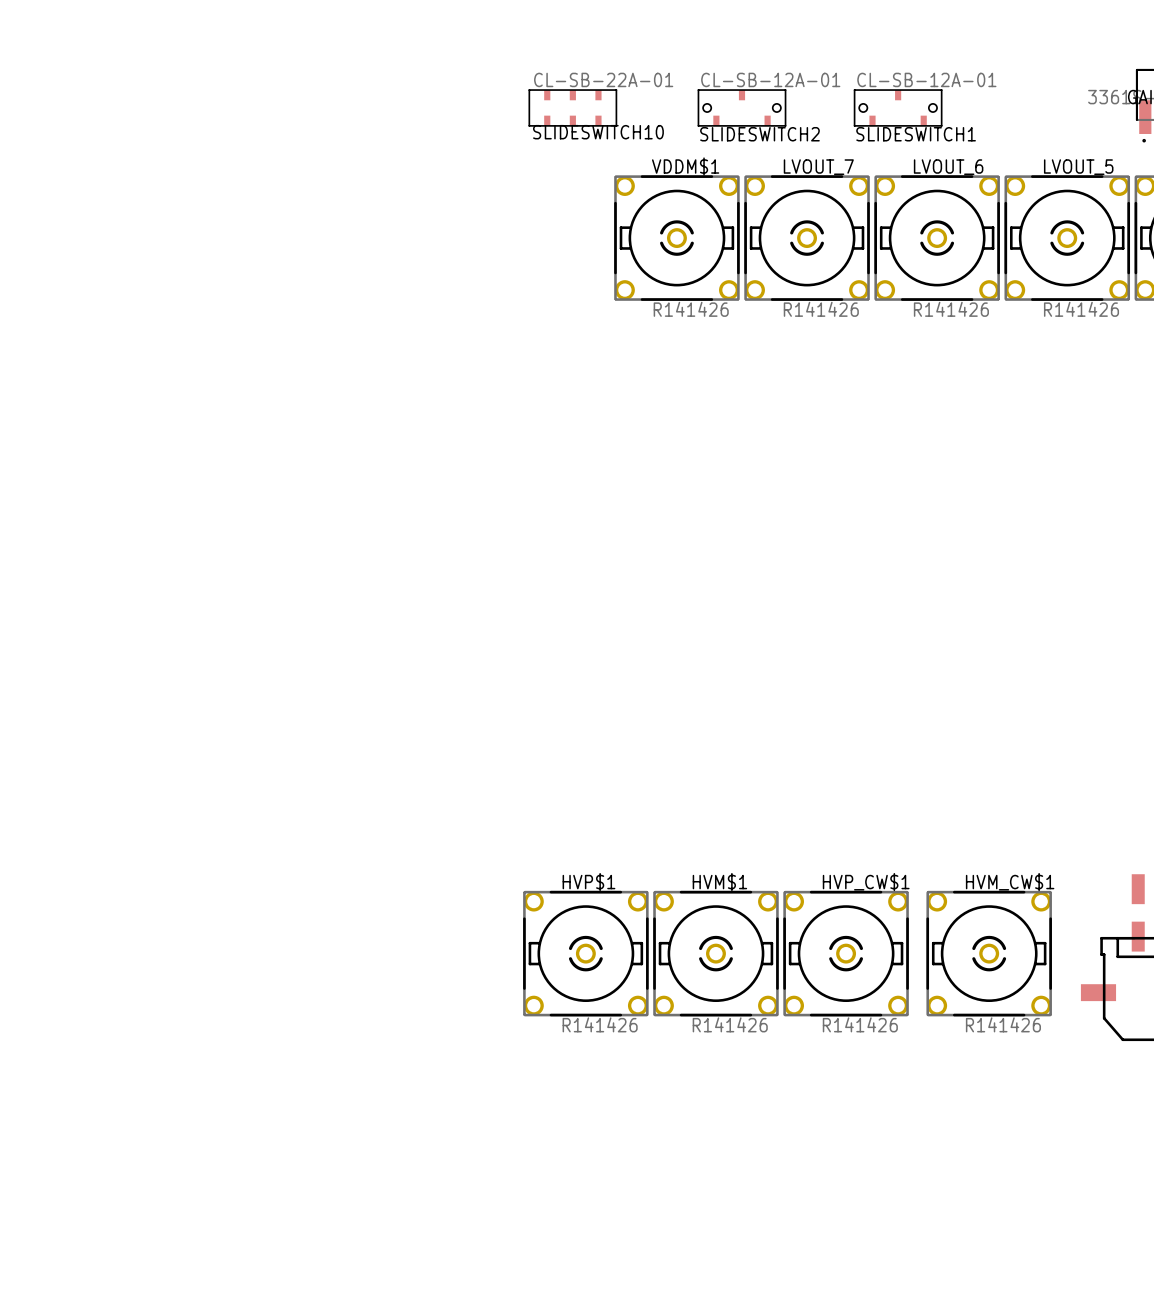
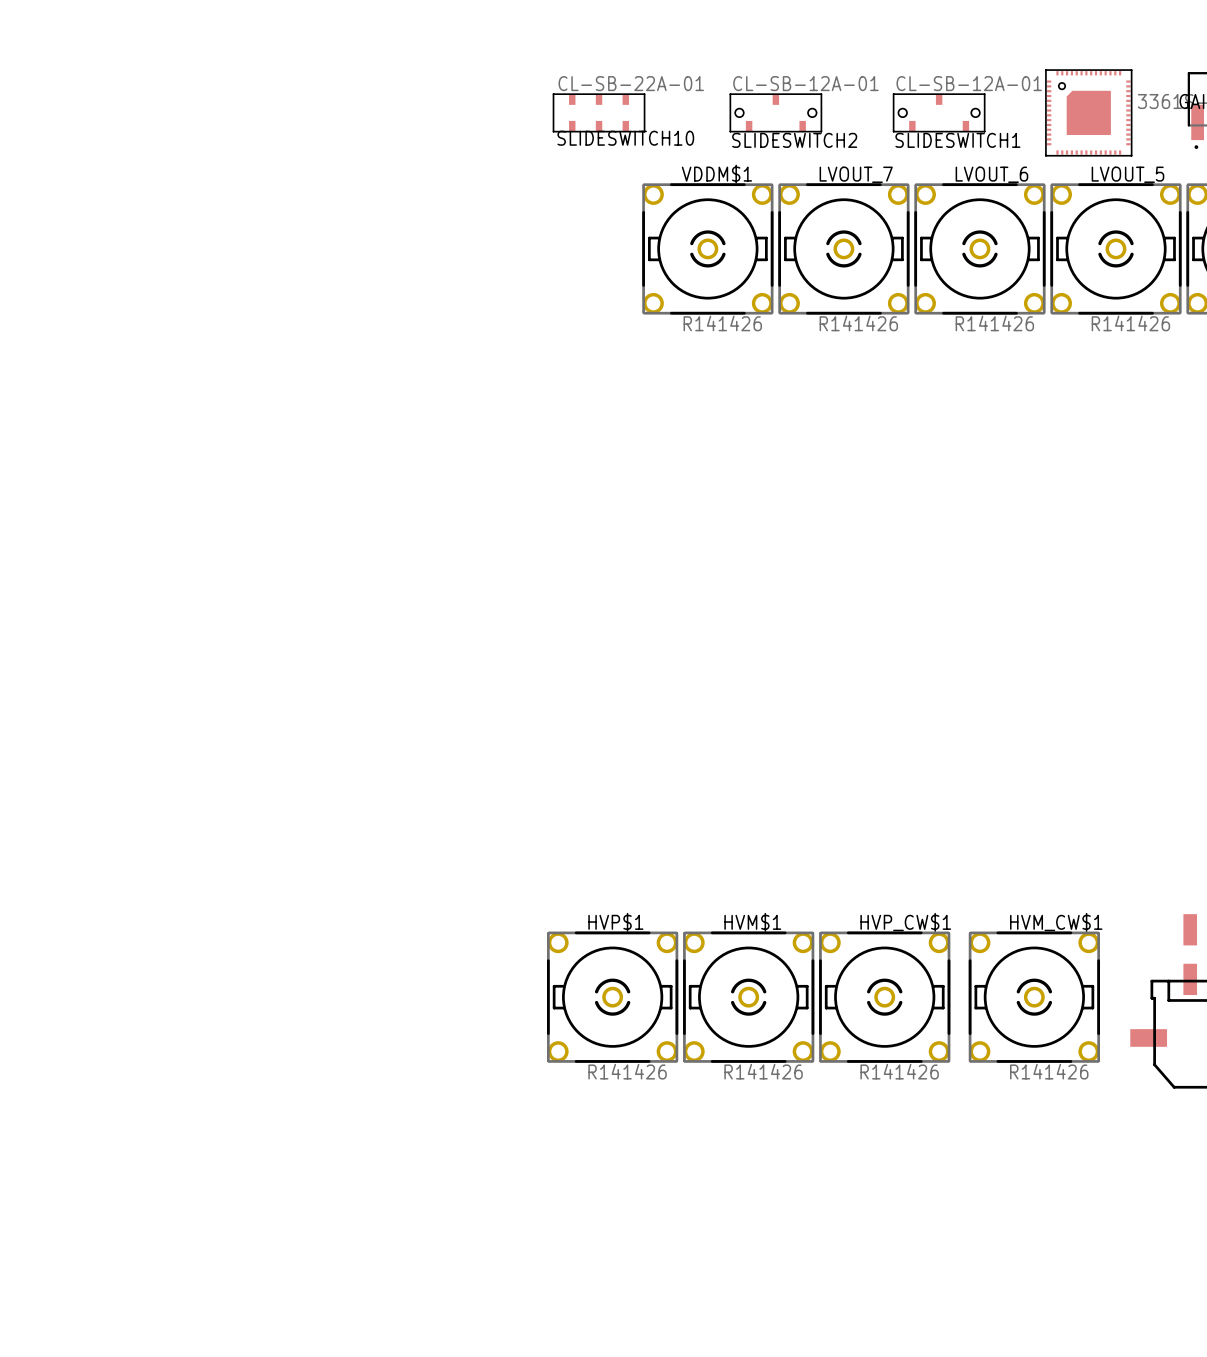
part: none -> (1088, 112)

